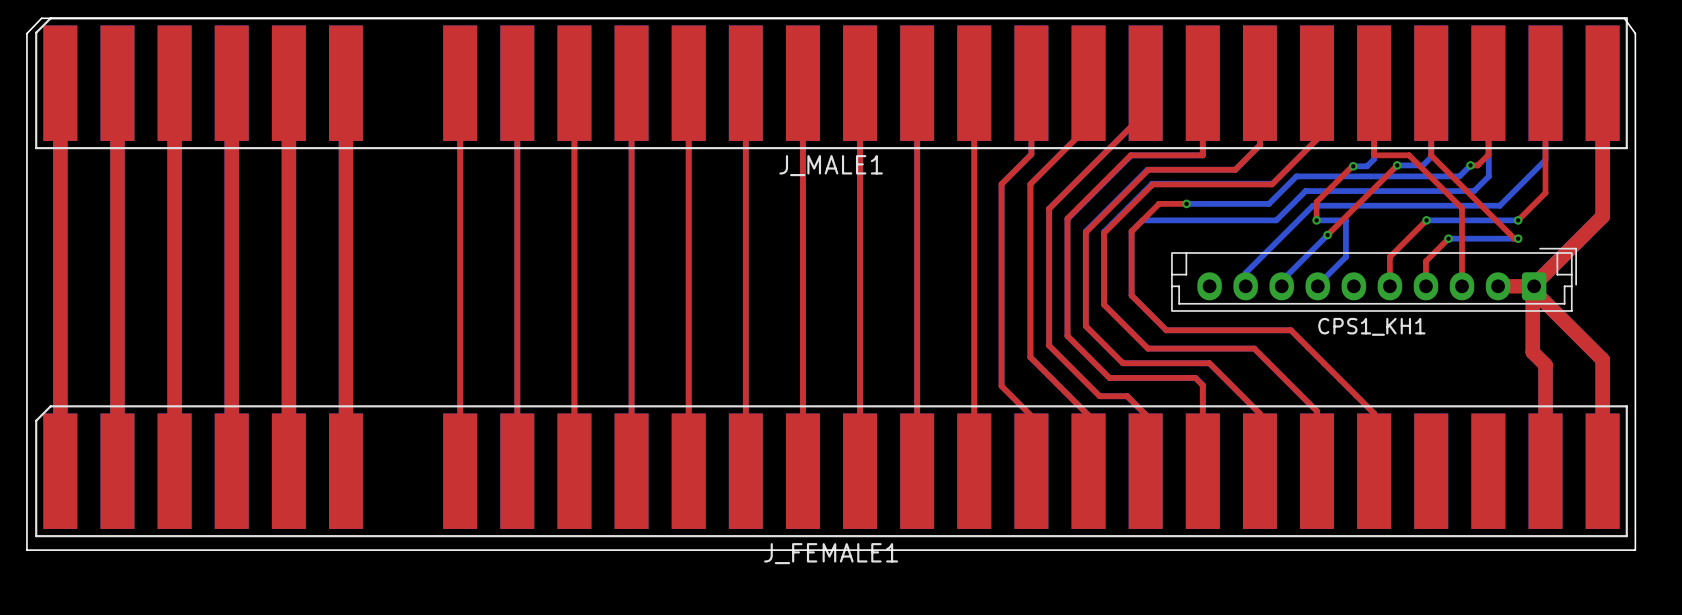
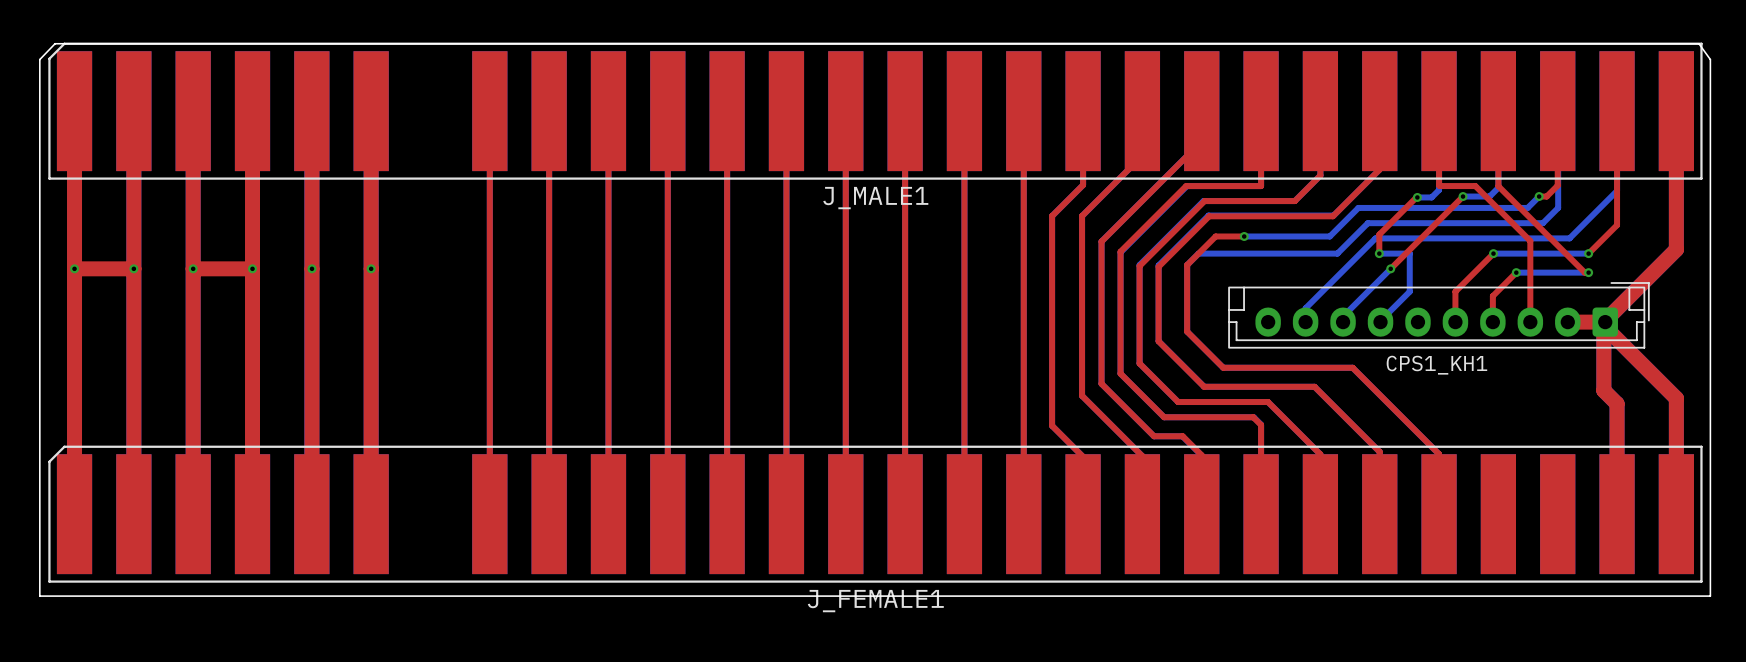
top track: none -> (74, 268) (133, 268)
via: none -> (74, 268)
via: none -> (133, 268)
top track: none -> (193, 268) (252, 268)
via: none -> (193, 268)
via: none -> (252, 268)
via: none -> (311, 268)
via: none -> (371, 268)

